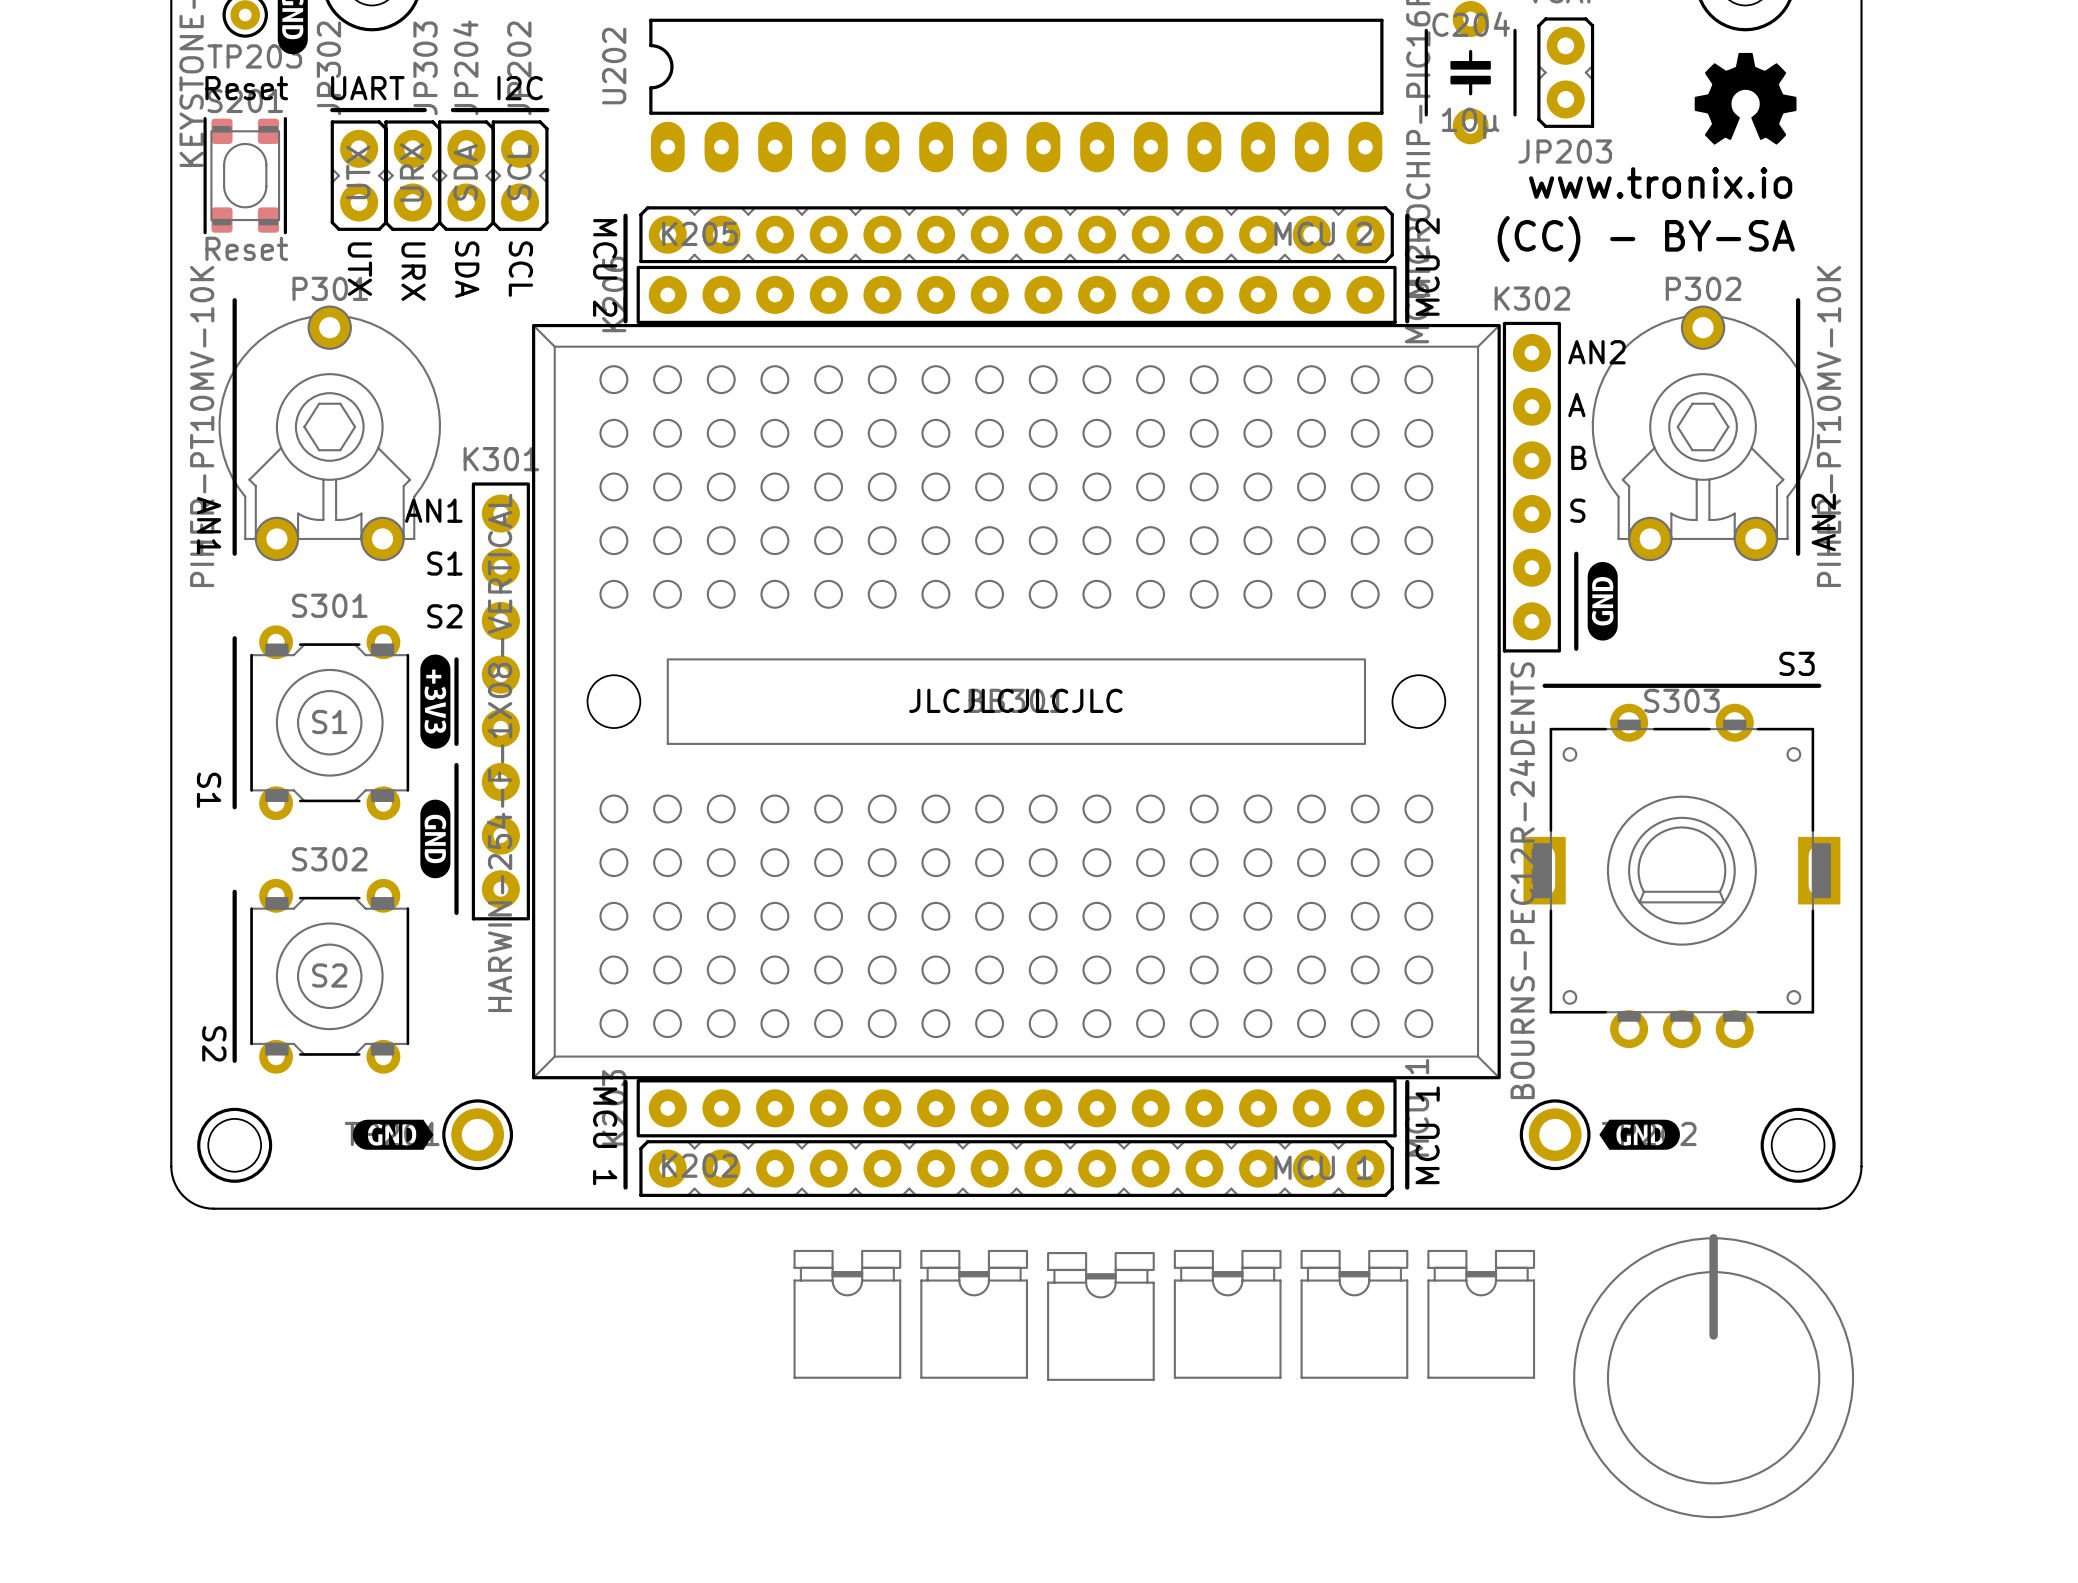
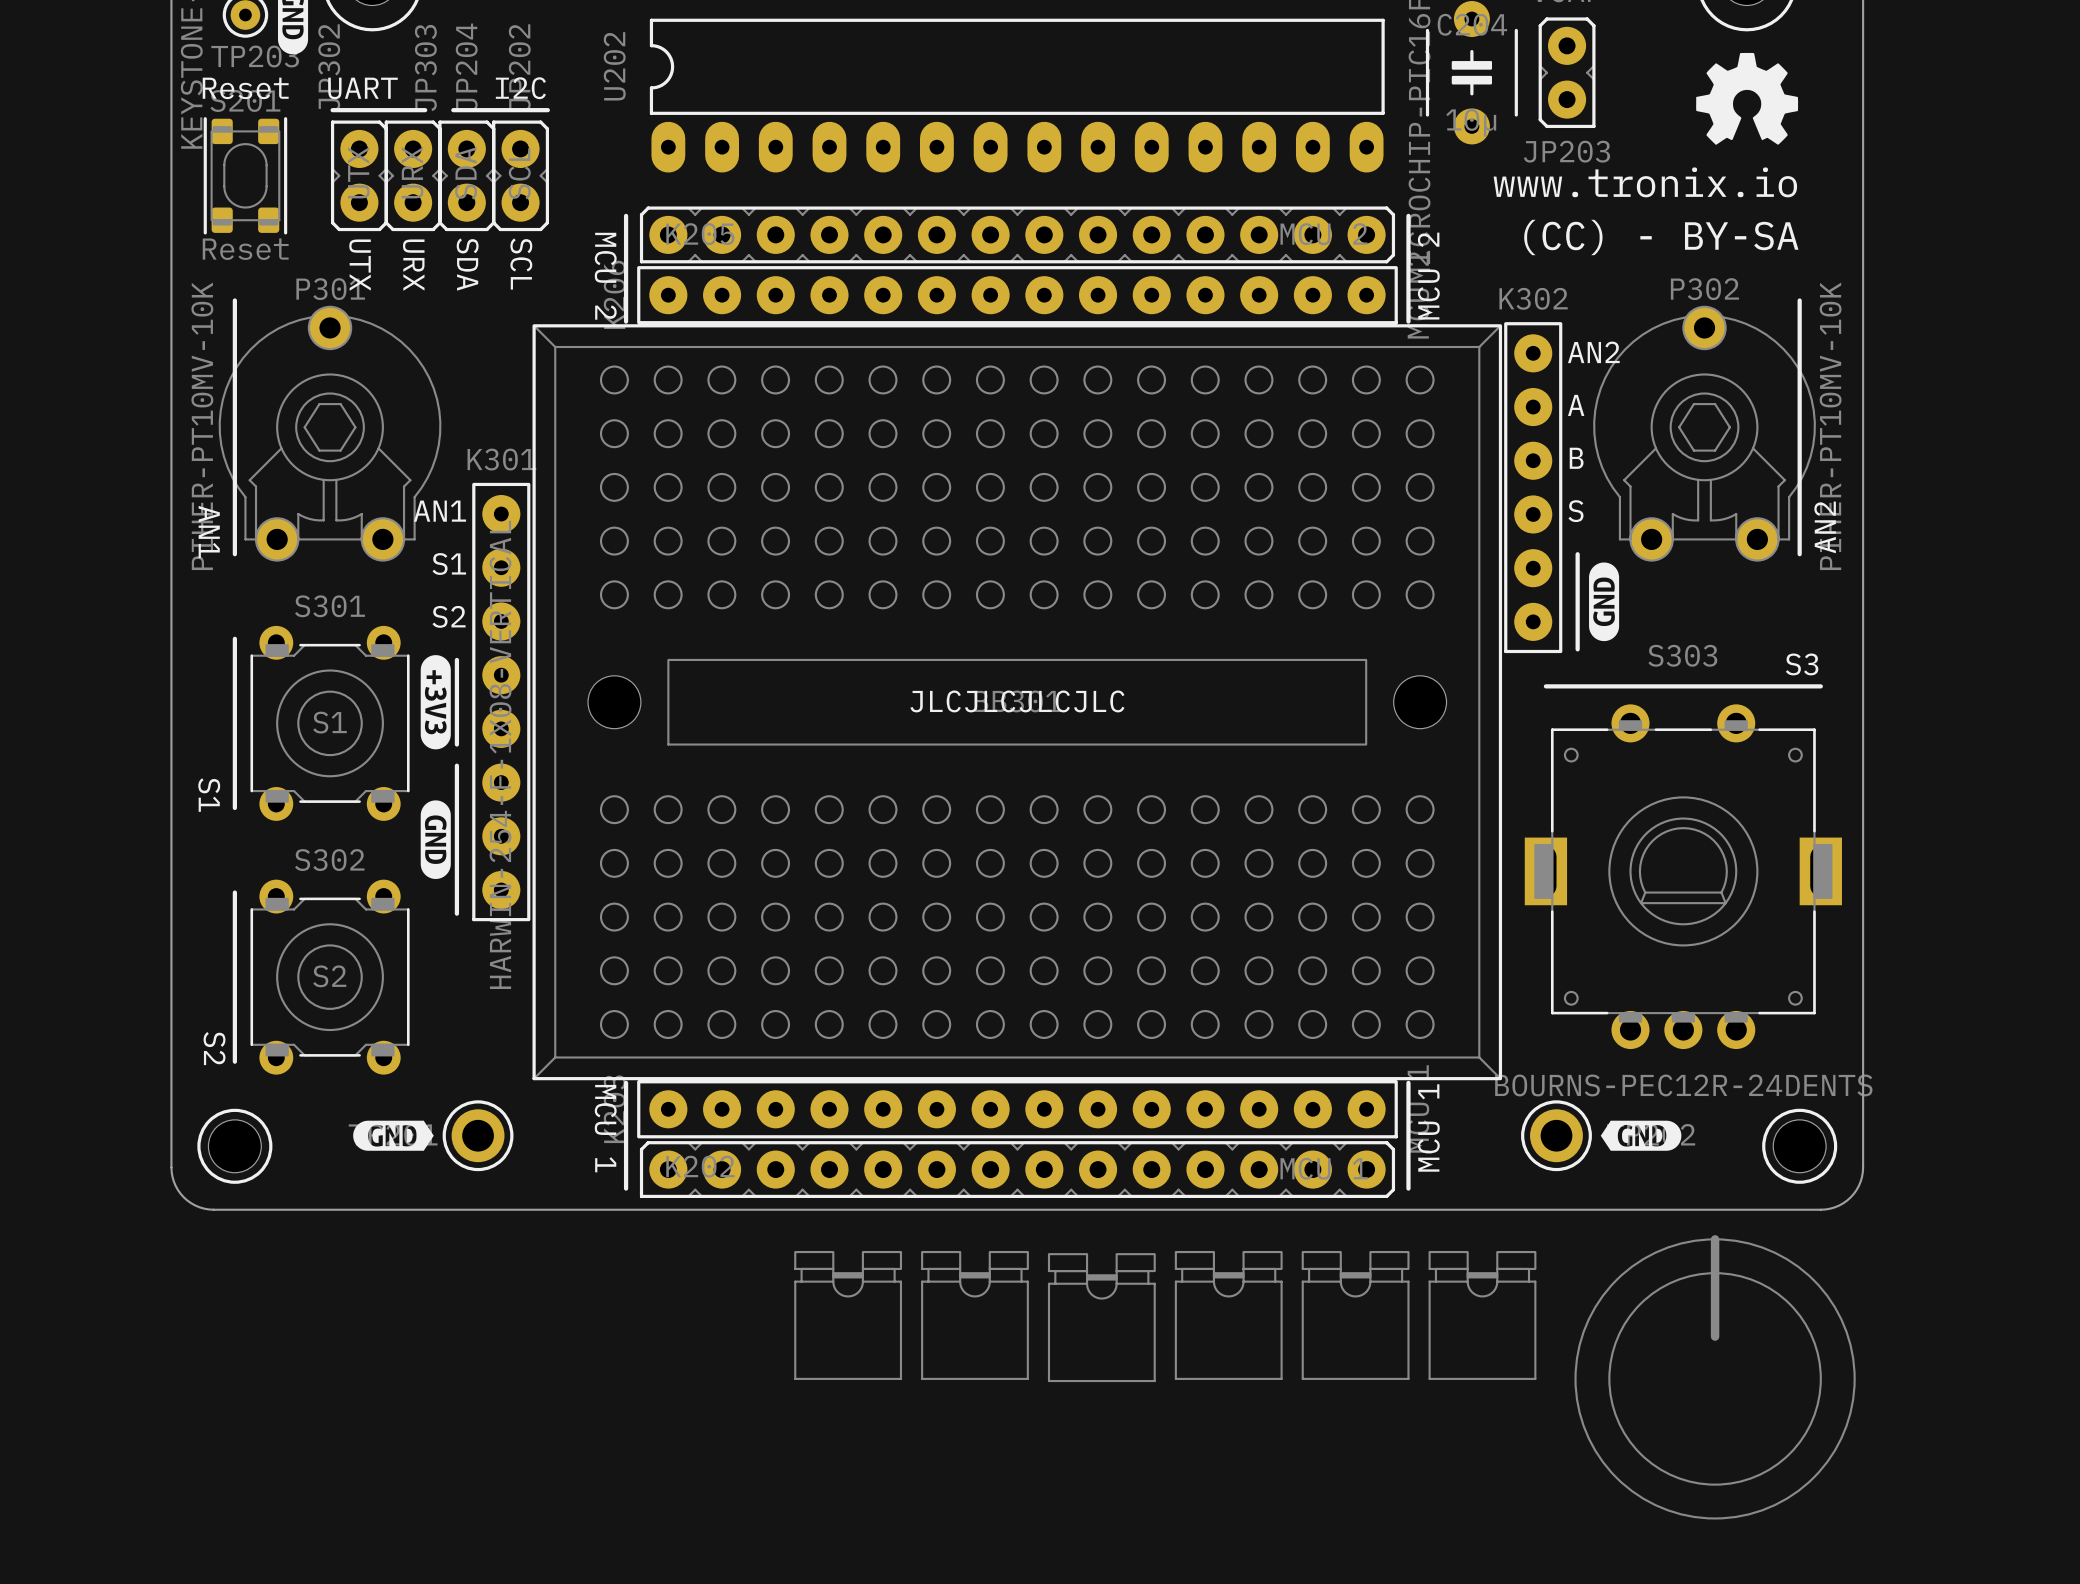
S303 name position: S303 (1681, 700) -> S303 (1682, 655)
S303 value rotation: 0° (1522, 880) -> 90° clockwise (1683, 1085)

